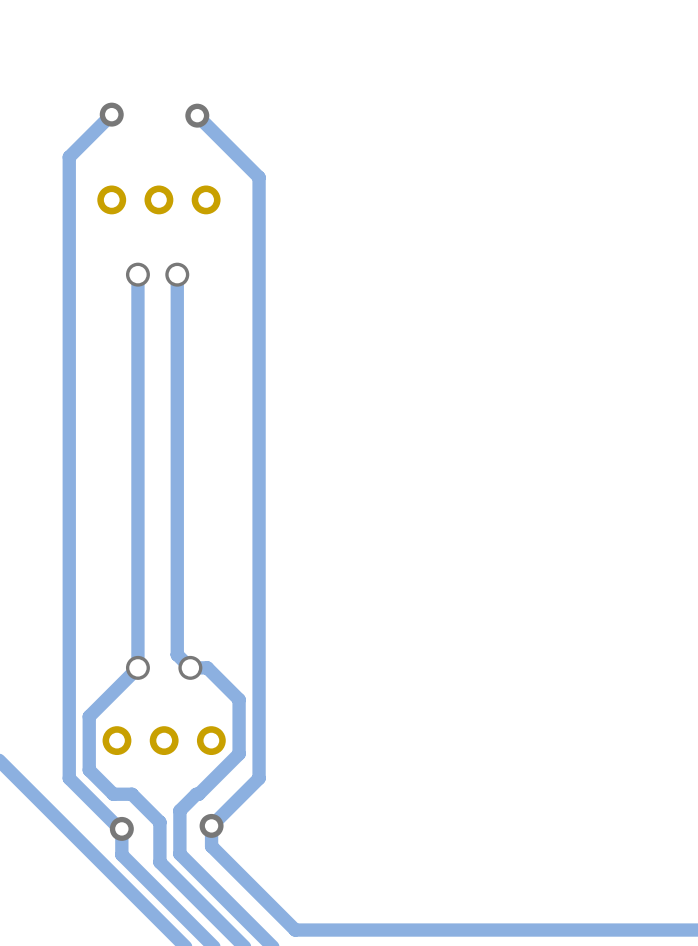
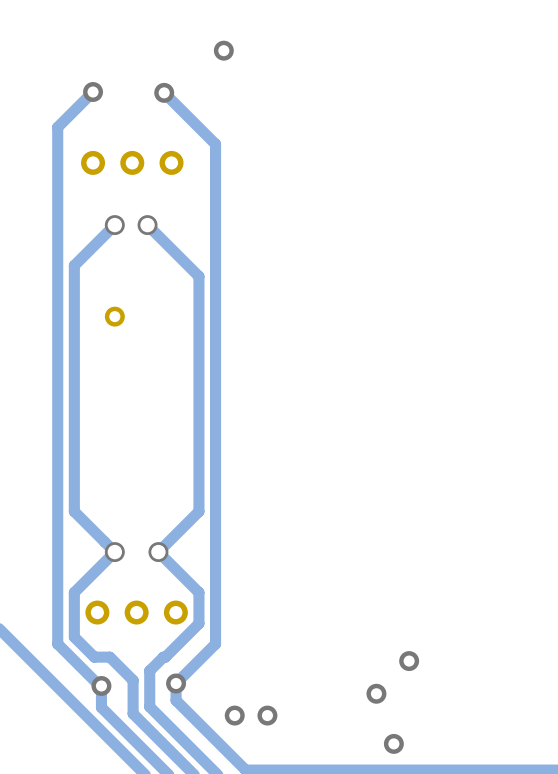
via: none -> (223, 50)
track: (137, 274) (137, 667) -> (114, 225) (74, 265) (74, 511) (114, 552)
track: (177, 274) (177, 654) (190, 667) (207, 667) (239, 699) (239, 716) -> (147, 225) (198, 276) (198, 511) (158, 552) (198, 592)
part: none -> (114, 316)
via: none -> (409, 661)
via: none -> (376, 693)
via: none -> (234, 715)
via: none -> (267, 715)
via: none -> (393, 743)

